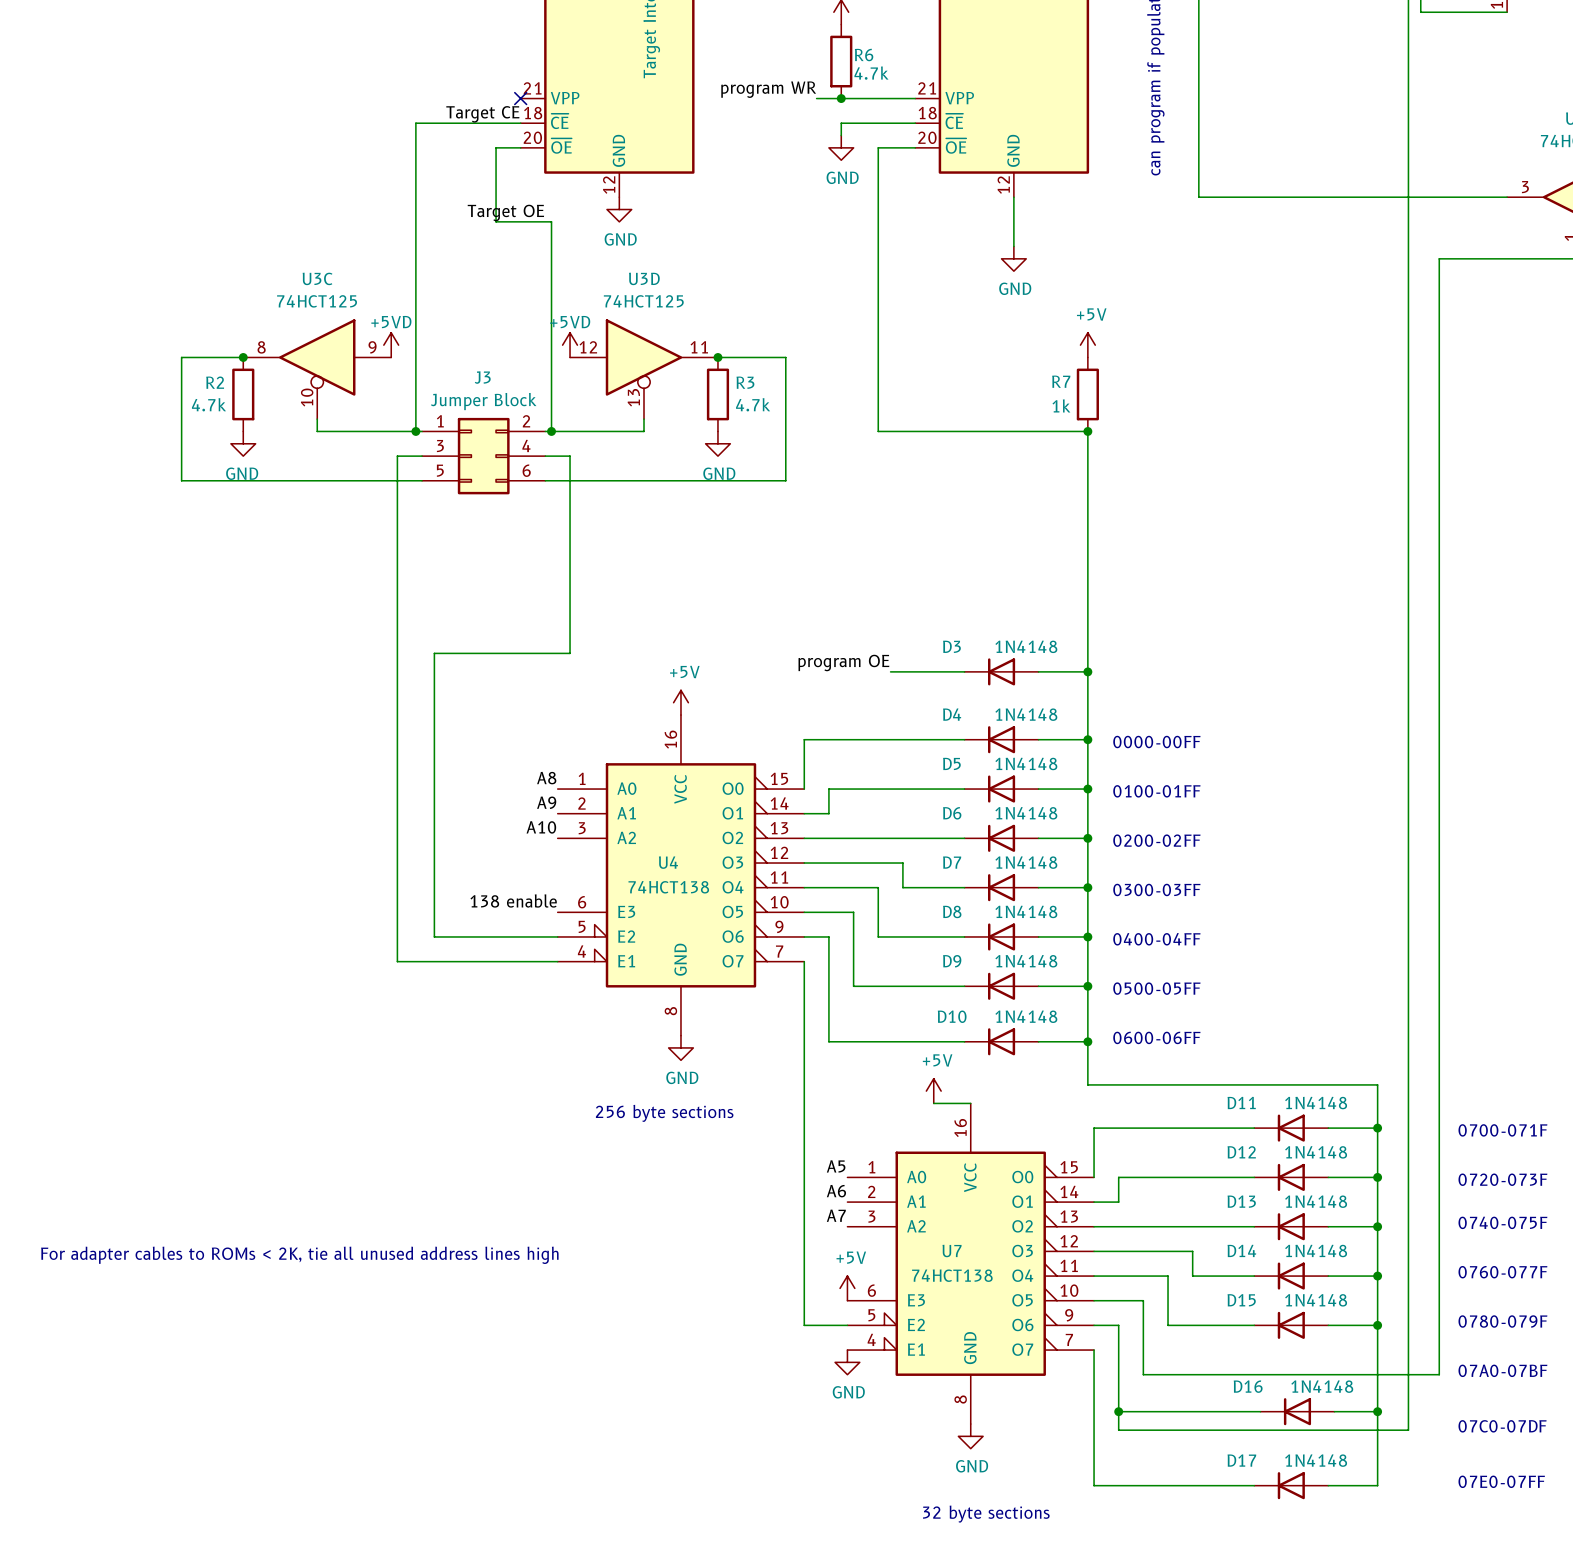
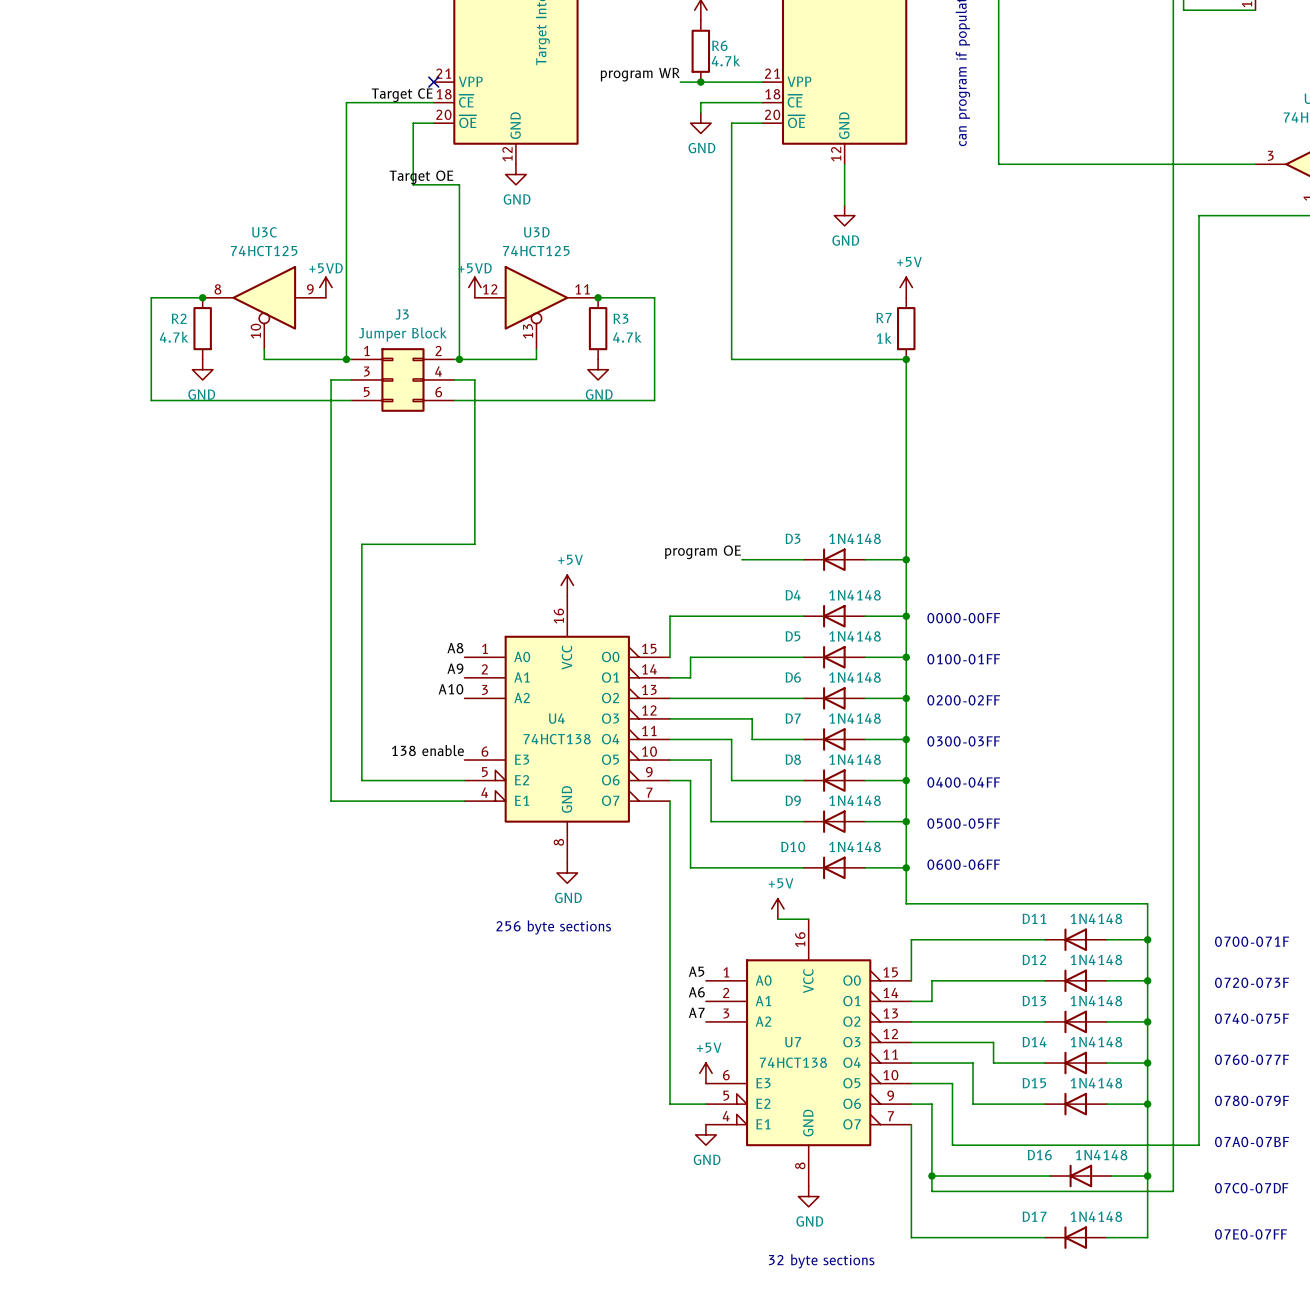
text: For adapter cables to ROMs < 2K, tie all unused address lines high (299, 1255) -> none

